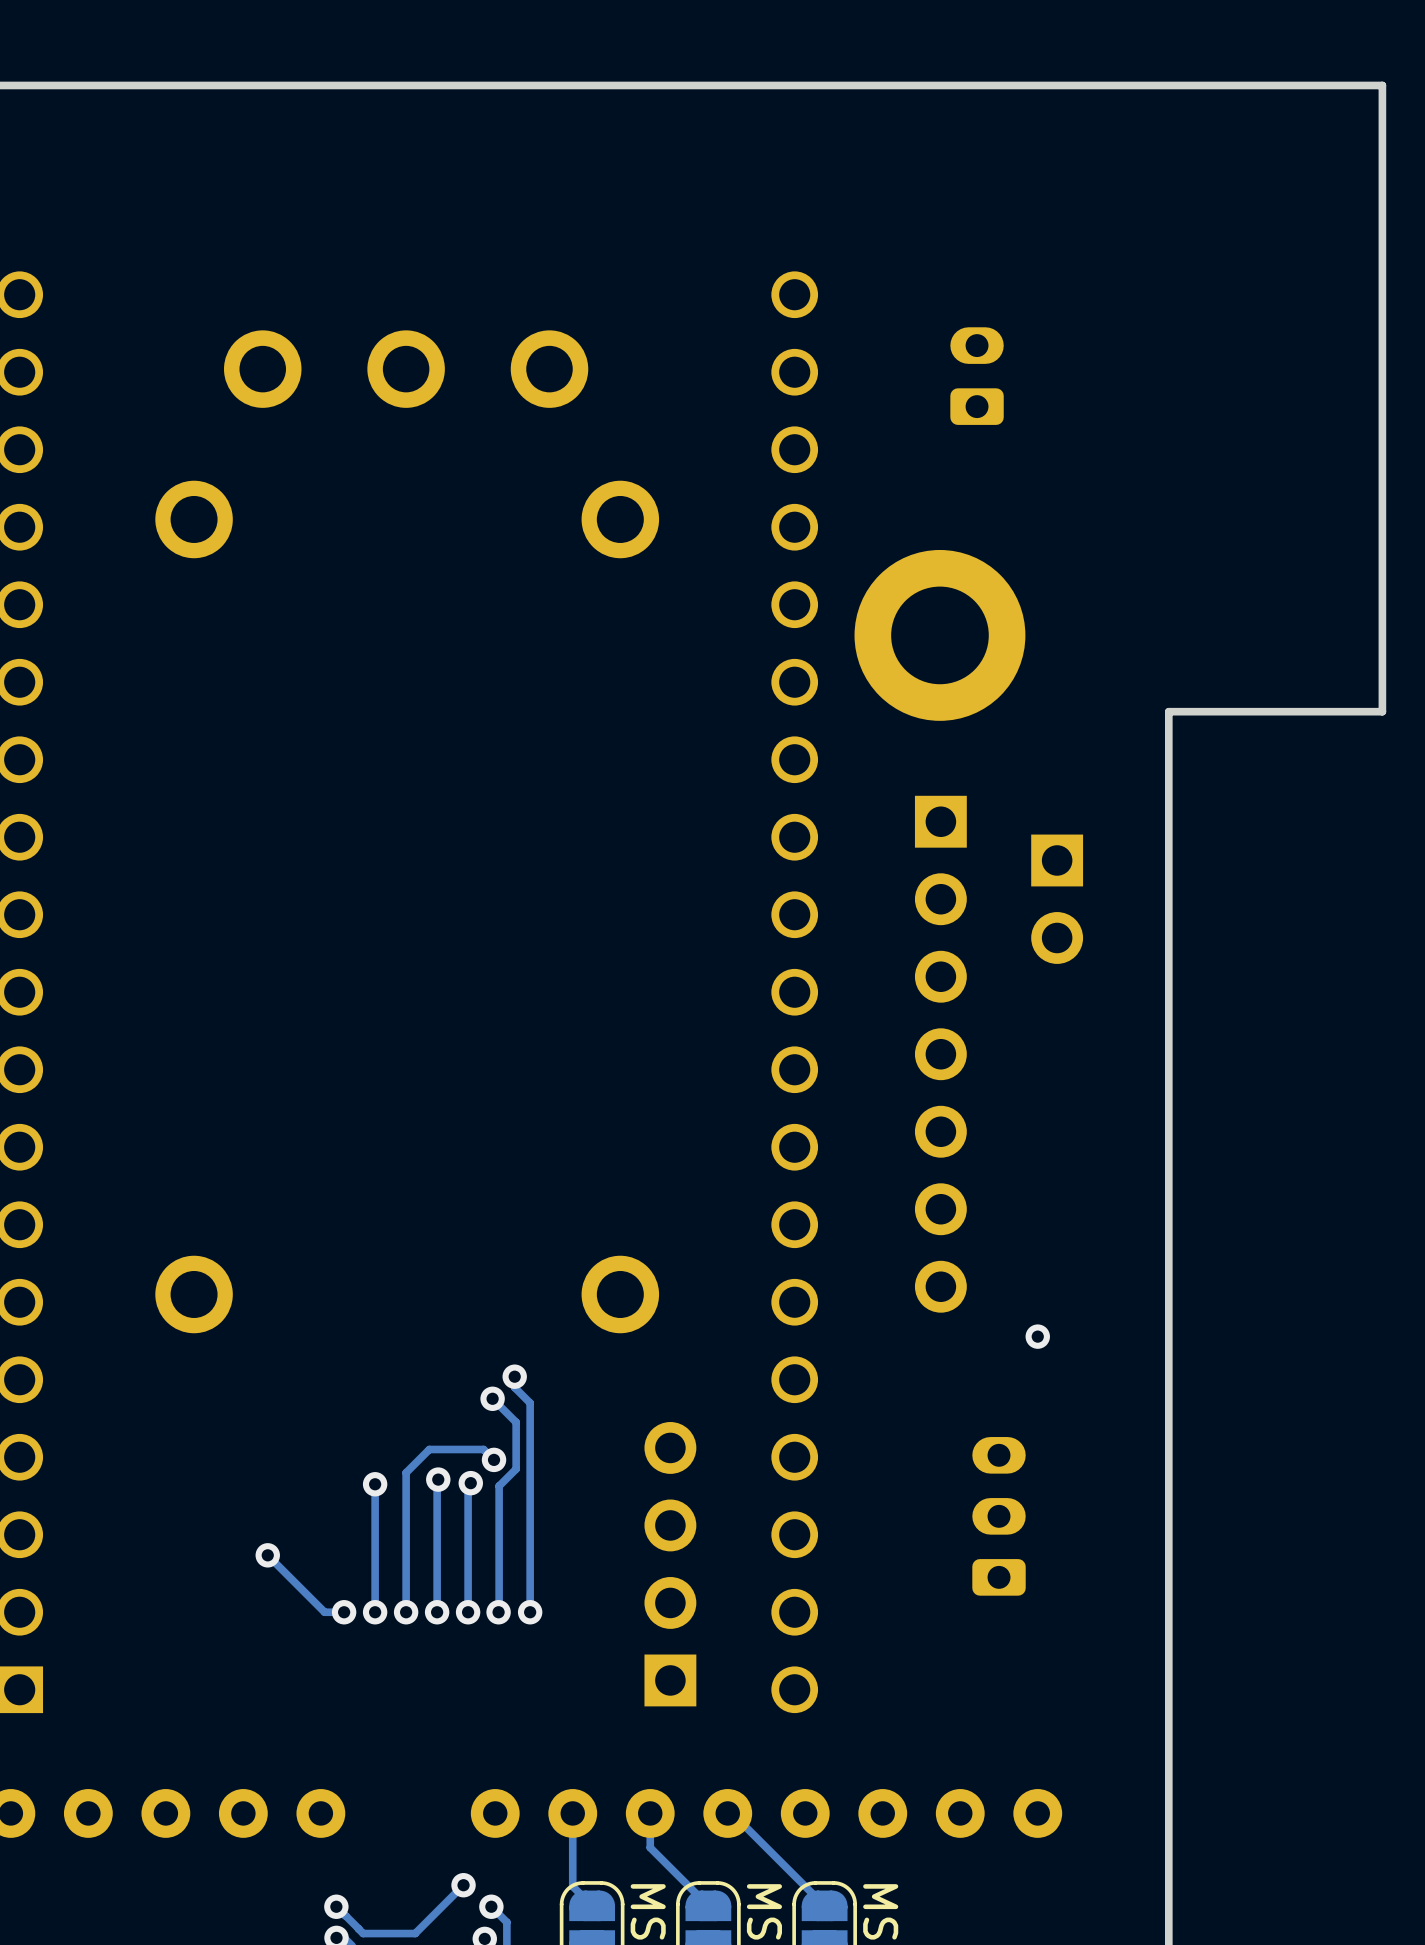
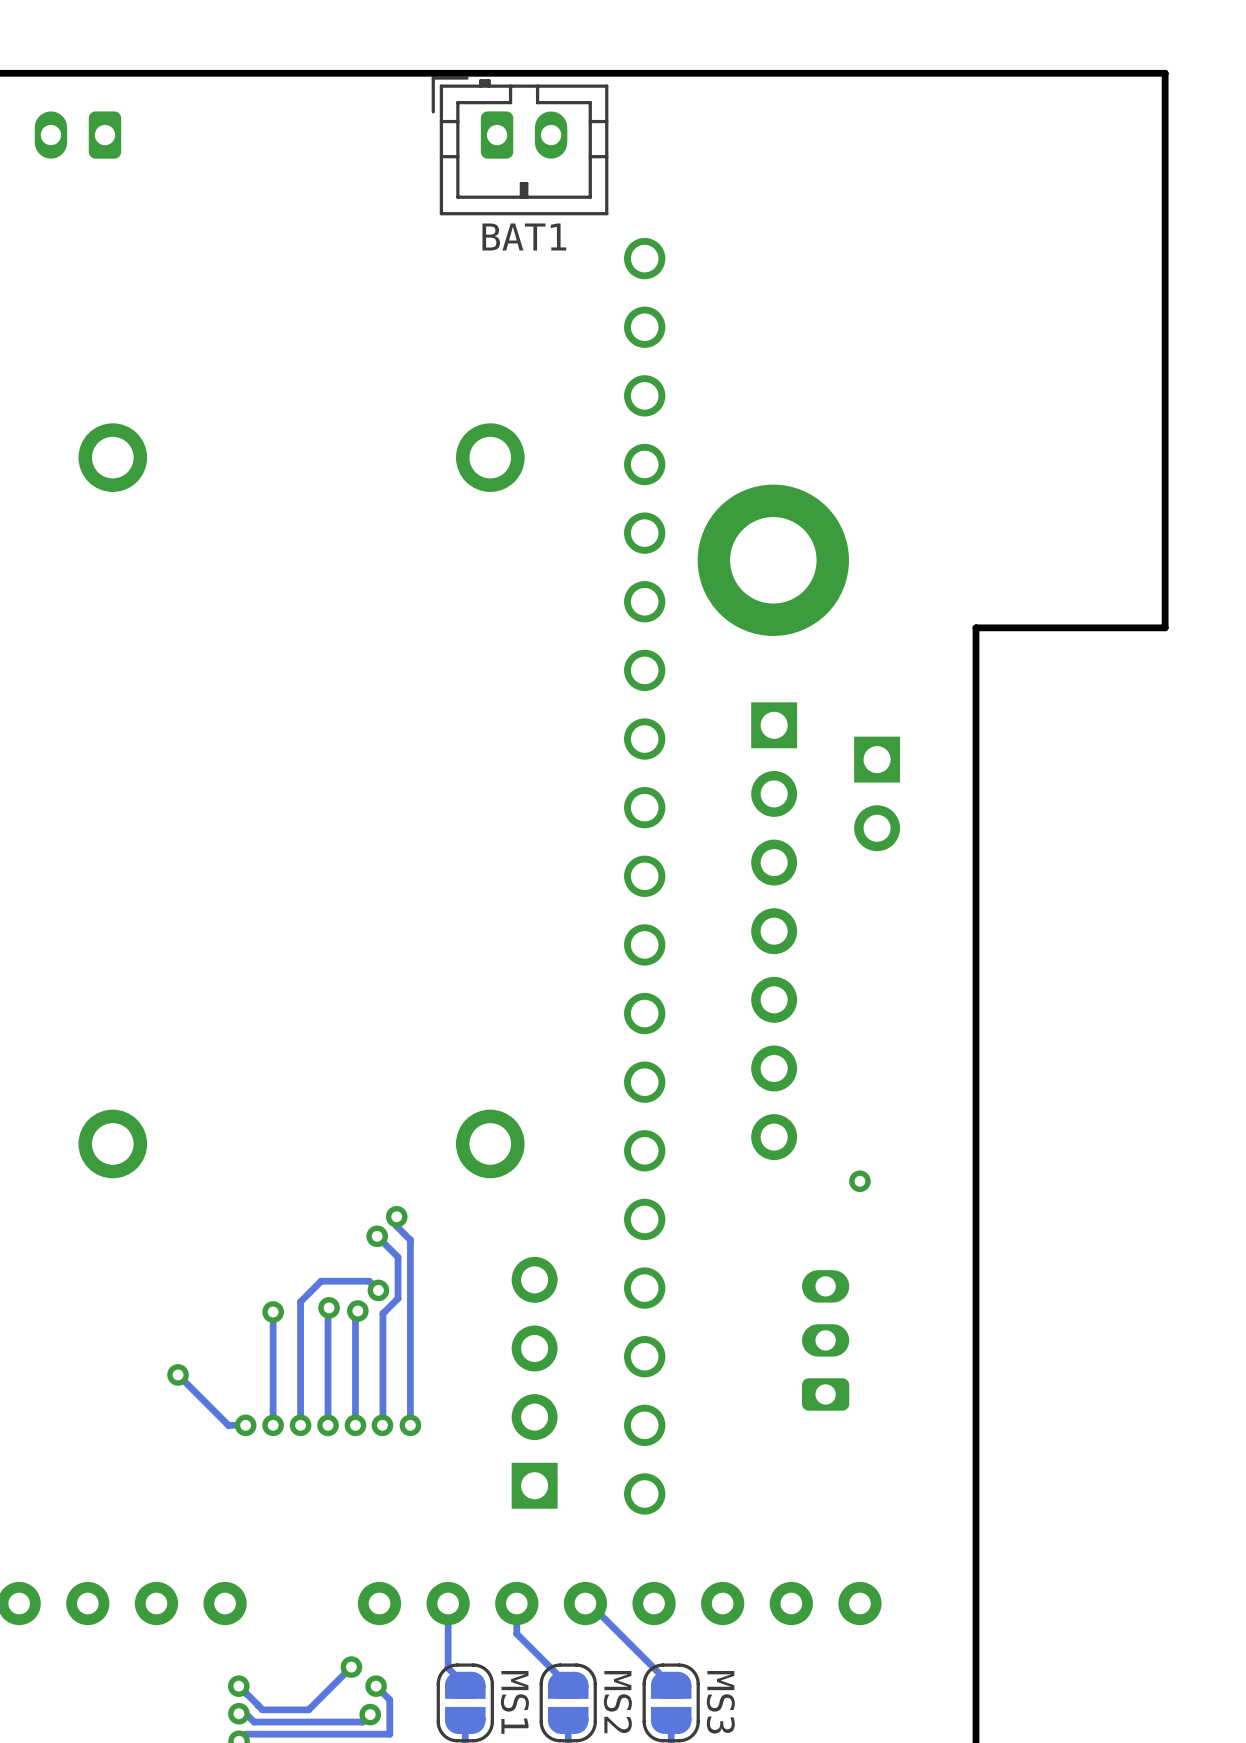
part: none -> (77, 135)
part: (406, 369) -> none
BAT1 side: top (977, 376) -> bottom (520, 145)

